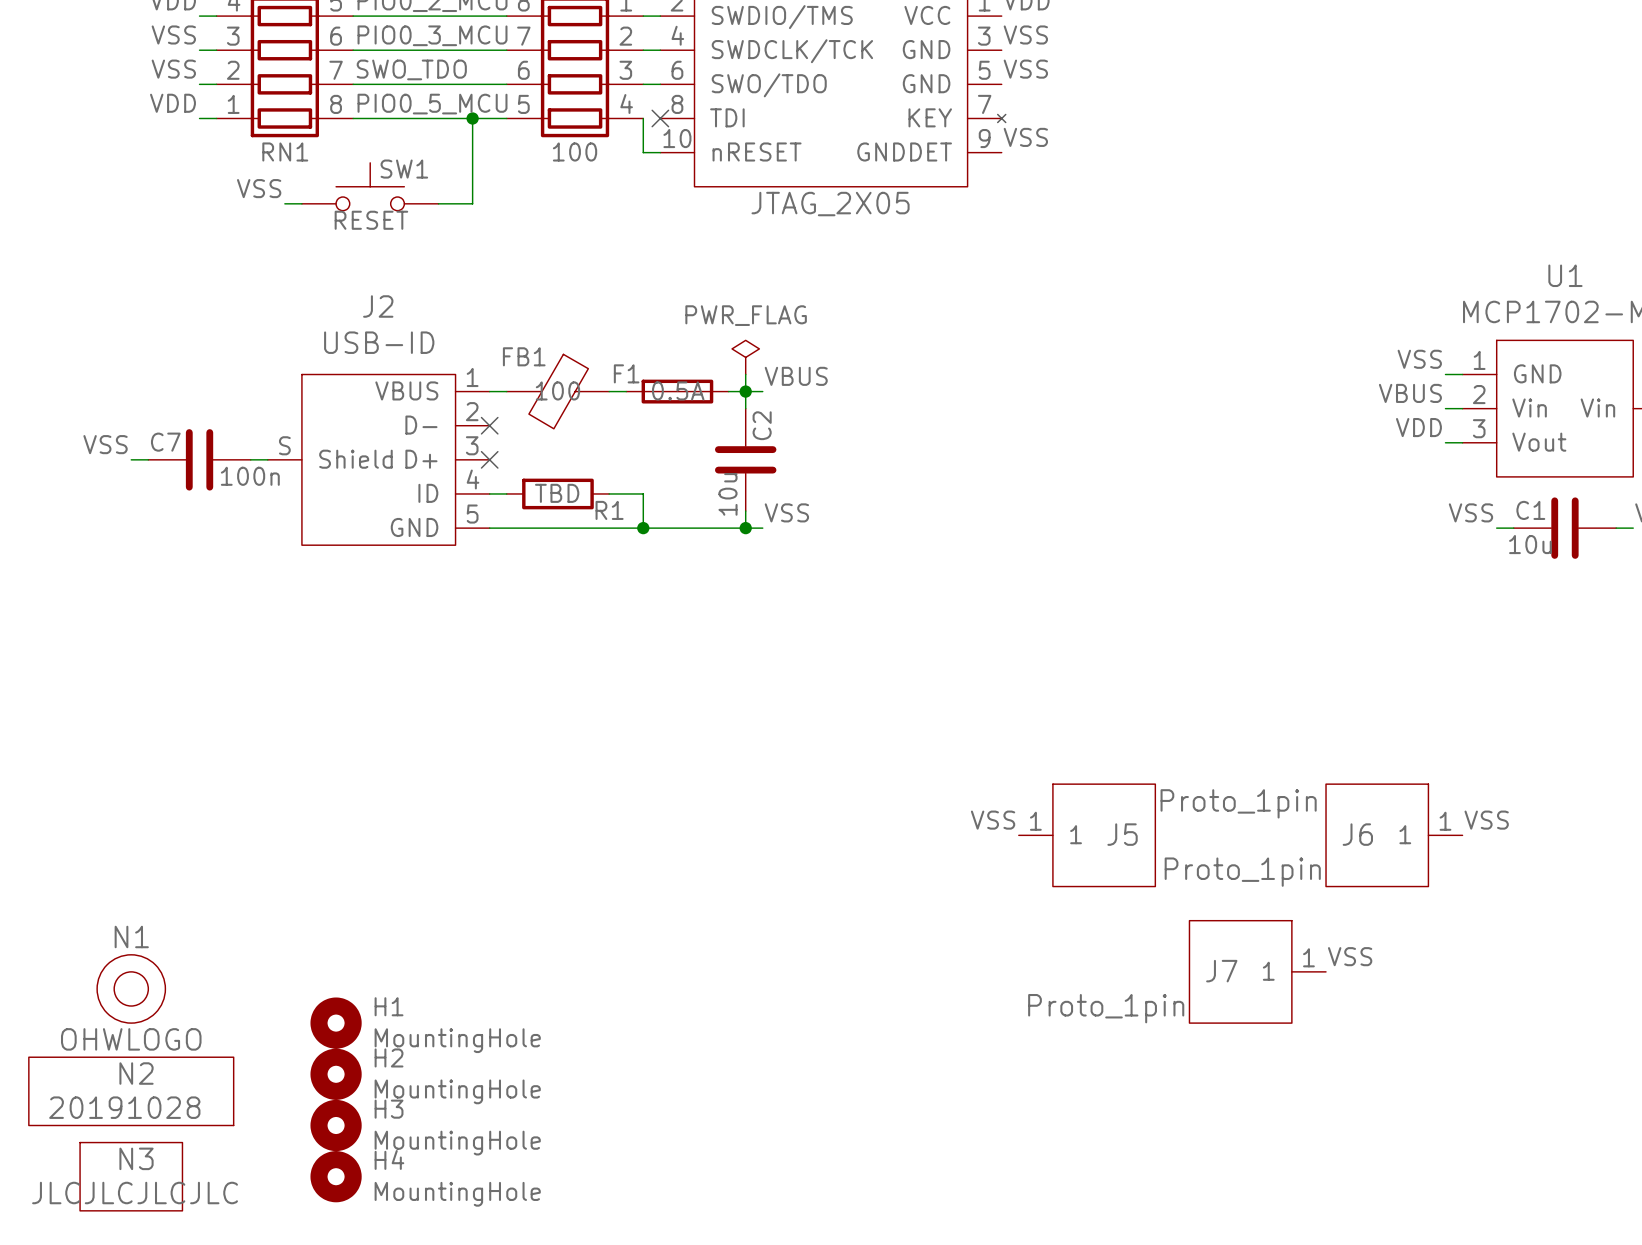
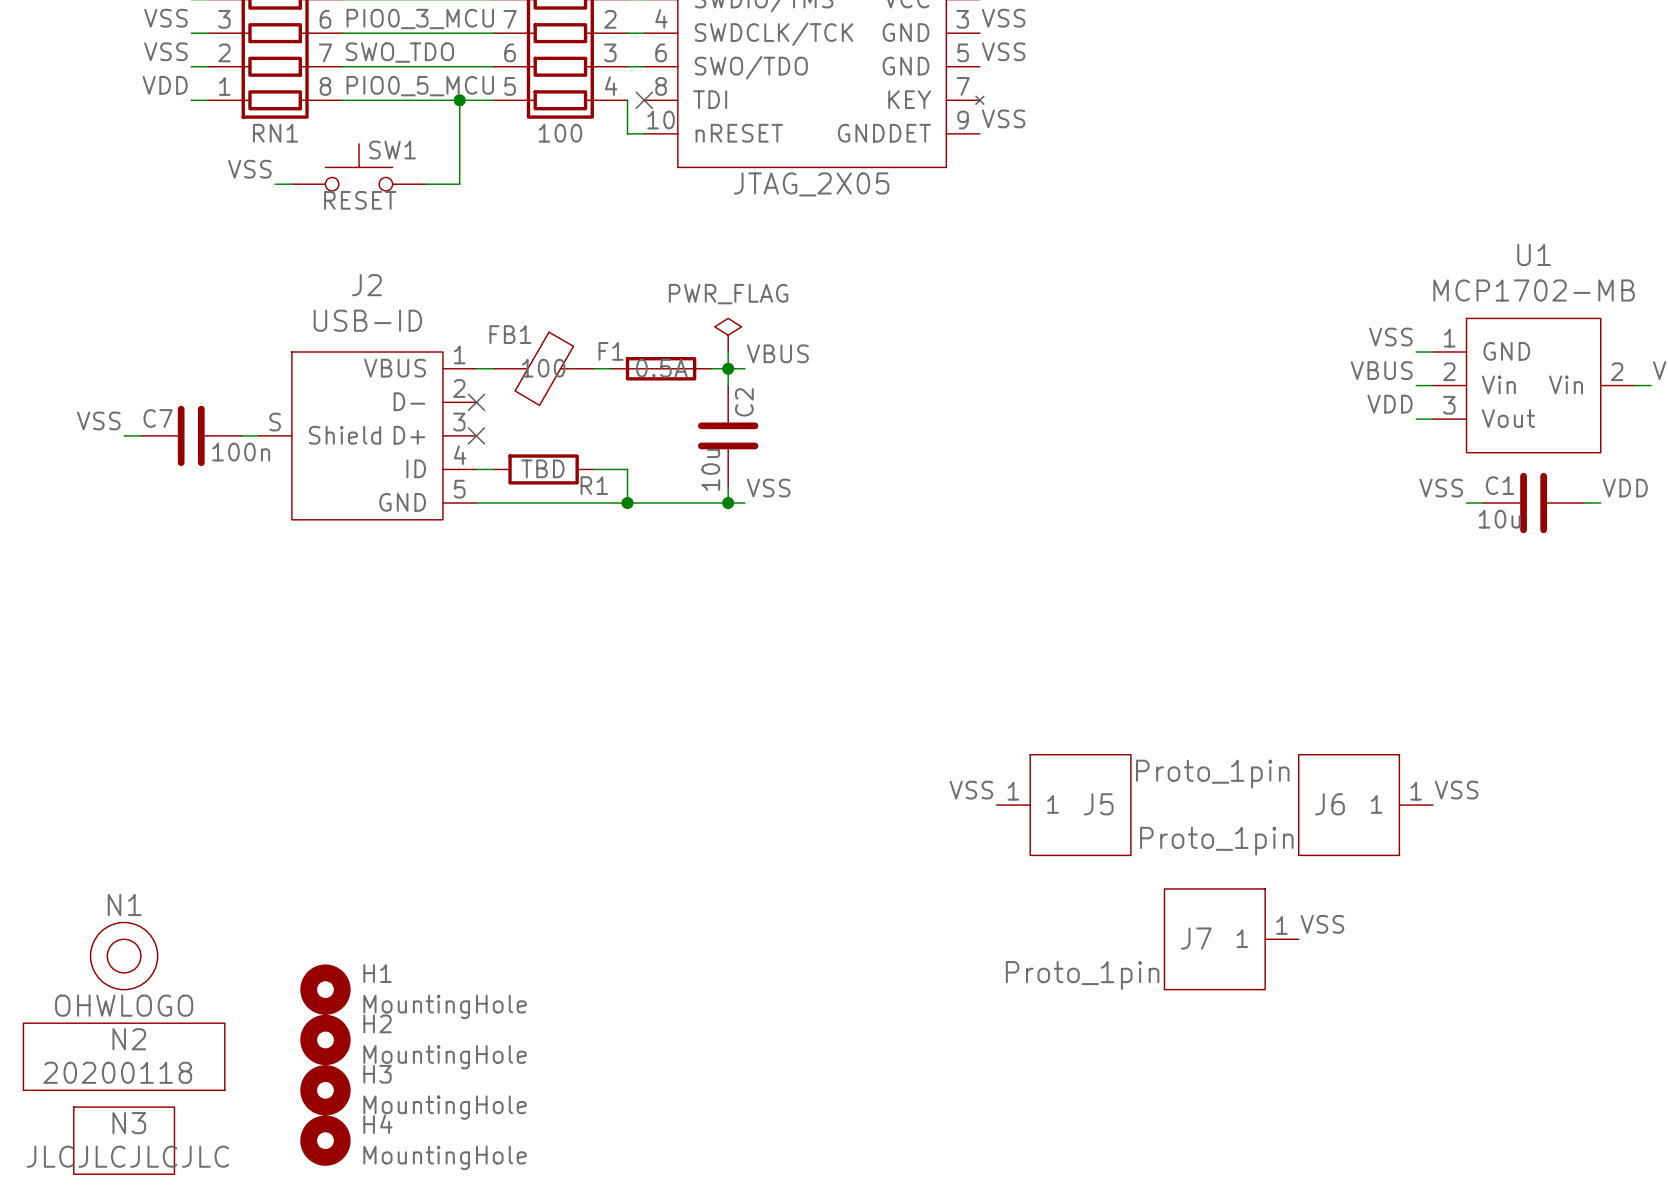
N2 value: 20191028 (124, 1107) -> 20200118 (117, 1072)

